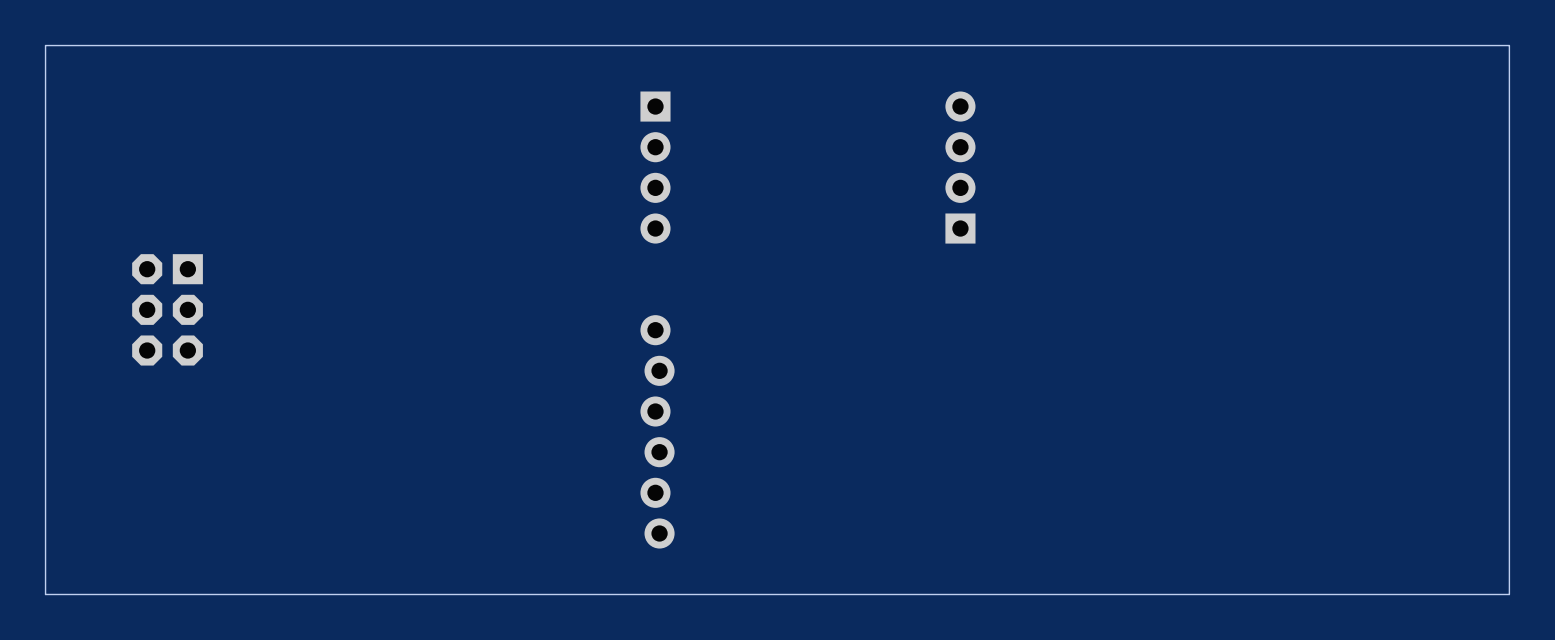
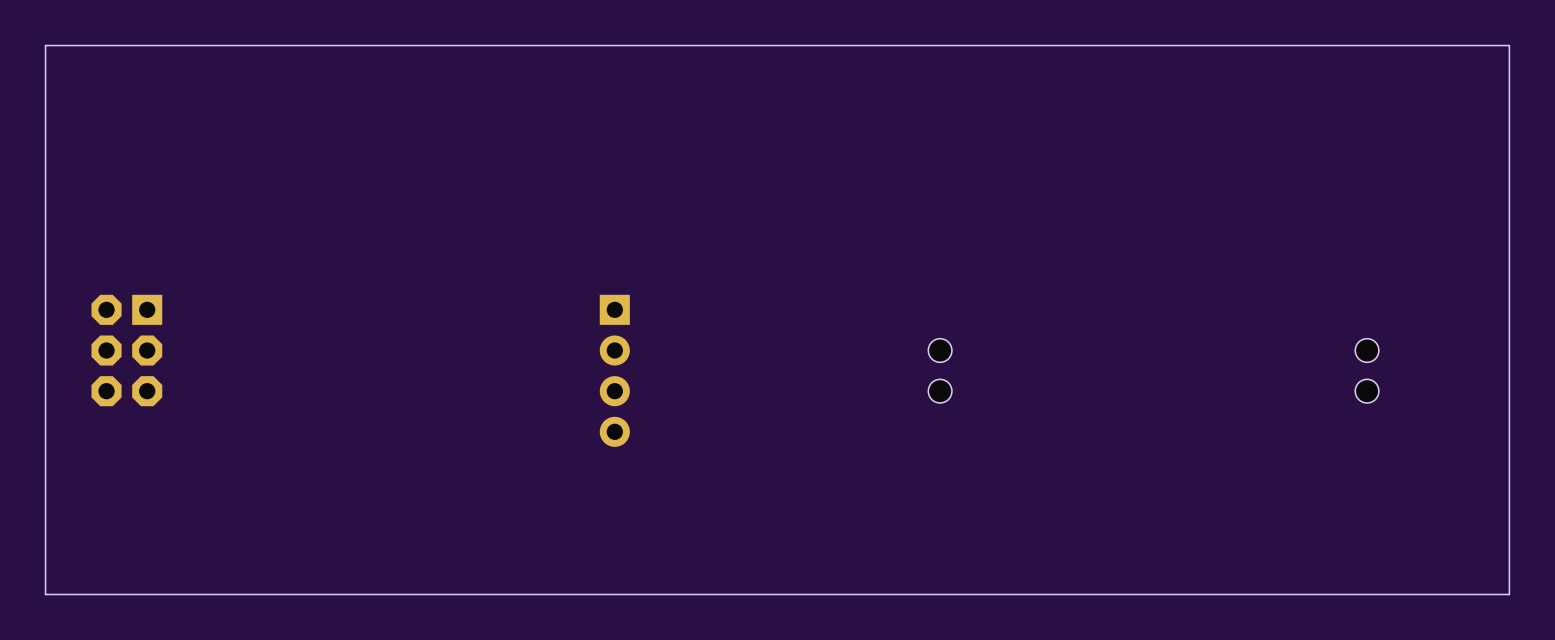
part: (655, 167) -> none
part: (960, 167) -> none
part position: (167, 309) -> (126, 350)
part: none -> (614, 370)
part: none -> (940, 370)
part: none -> (1367, 370)
part: (657, 431) -> none

